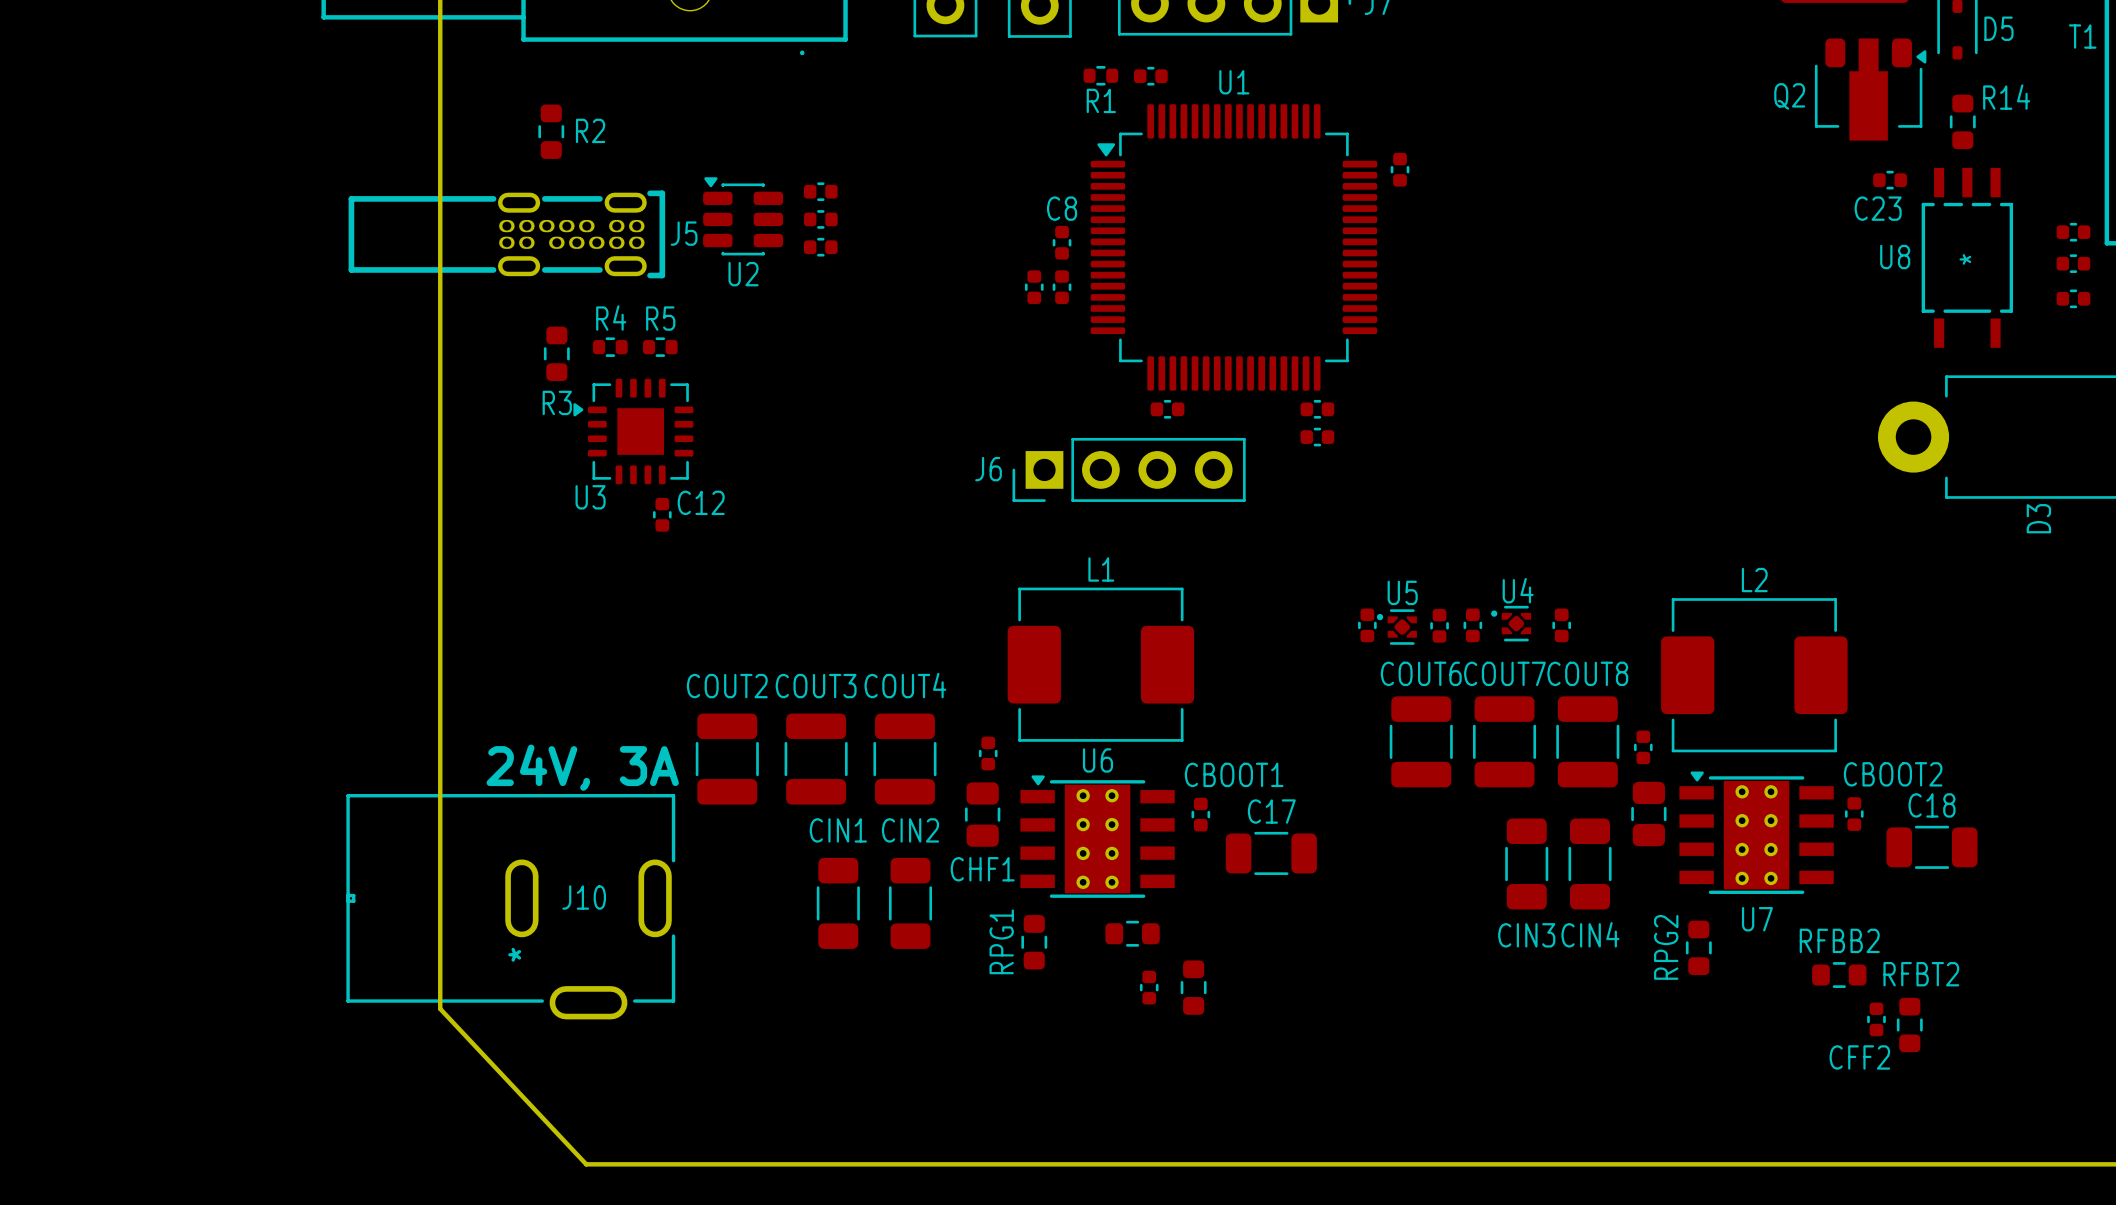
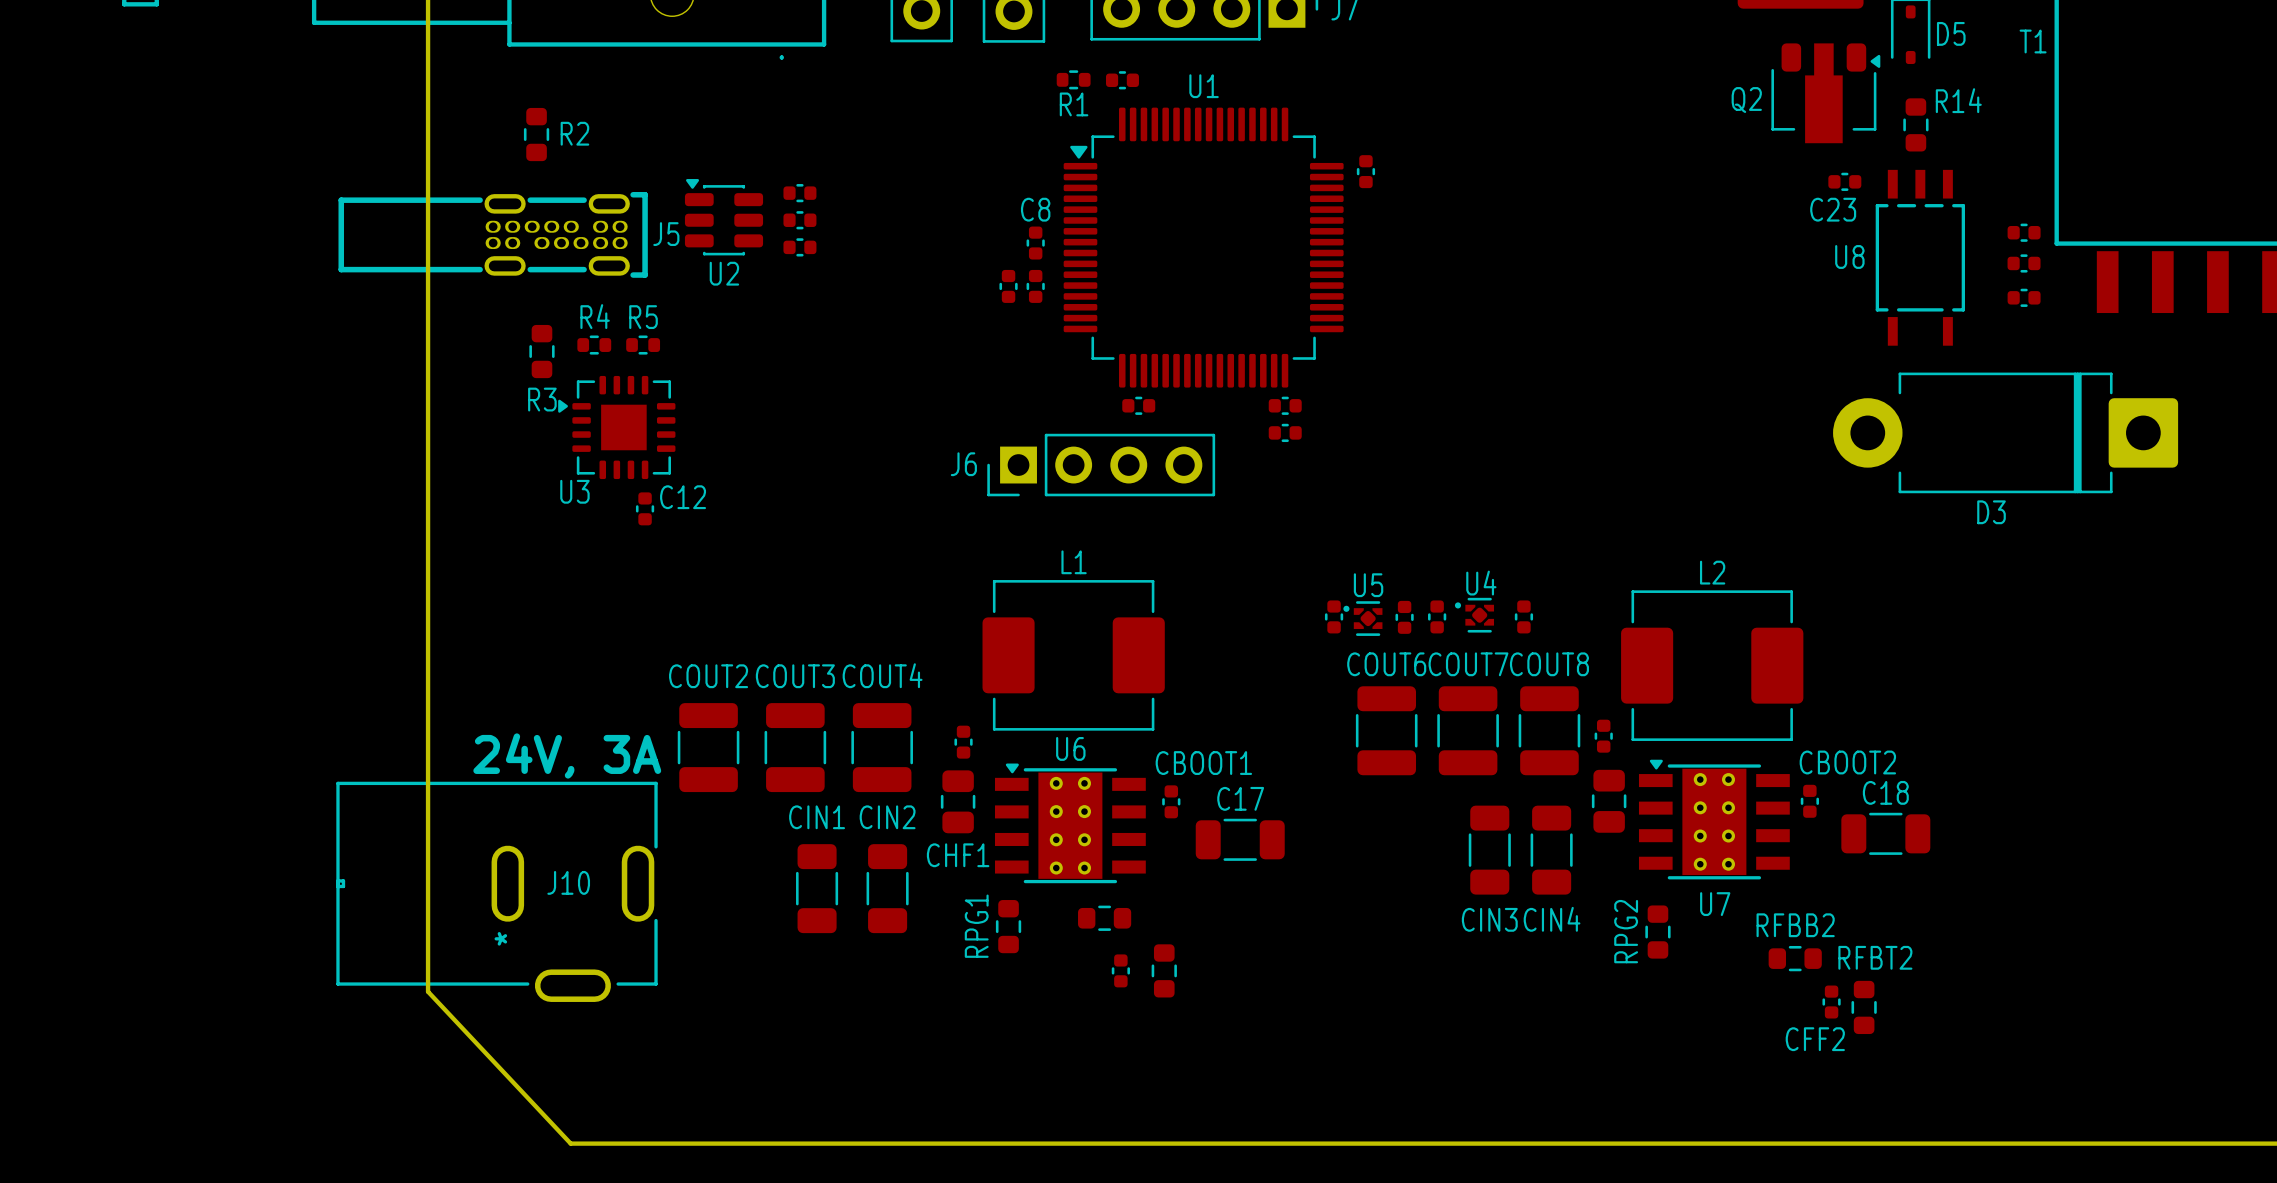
U8 text: * (1965, 259) -> none
D3 name rotation: 0° (2038, 518) -> 90° clockwise (1991, 512)

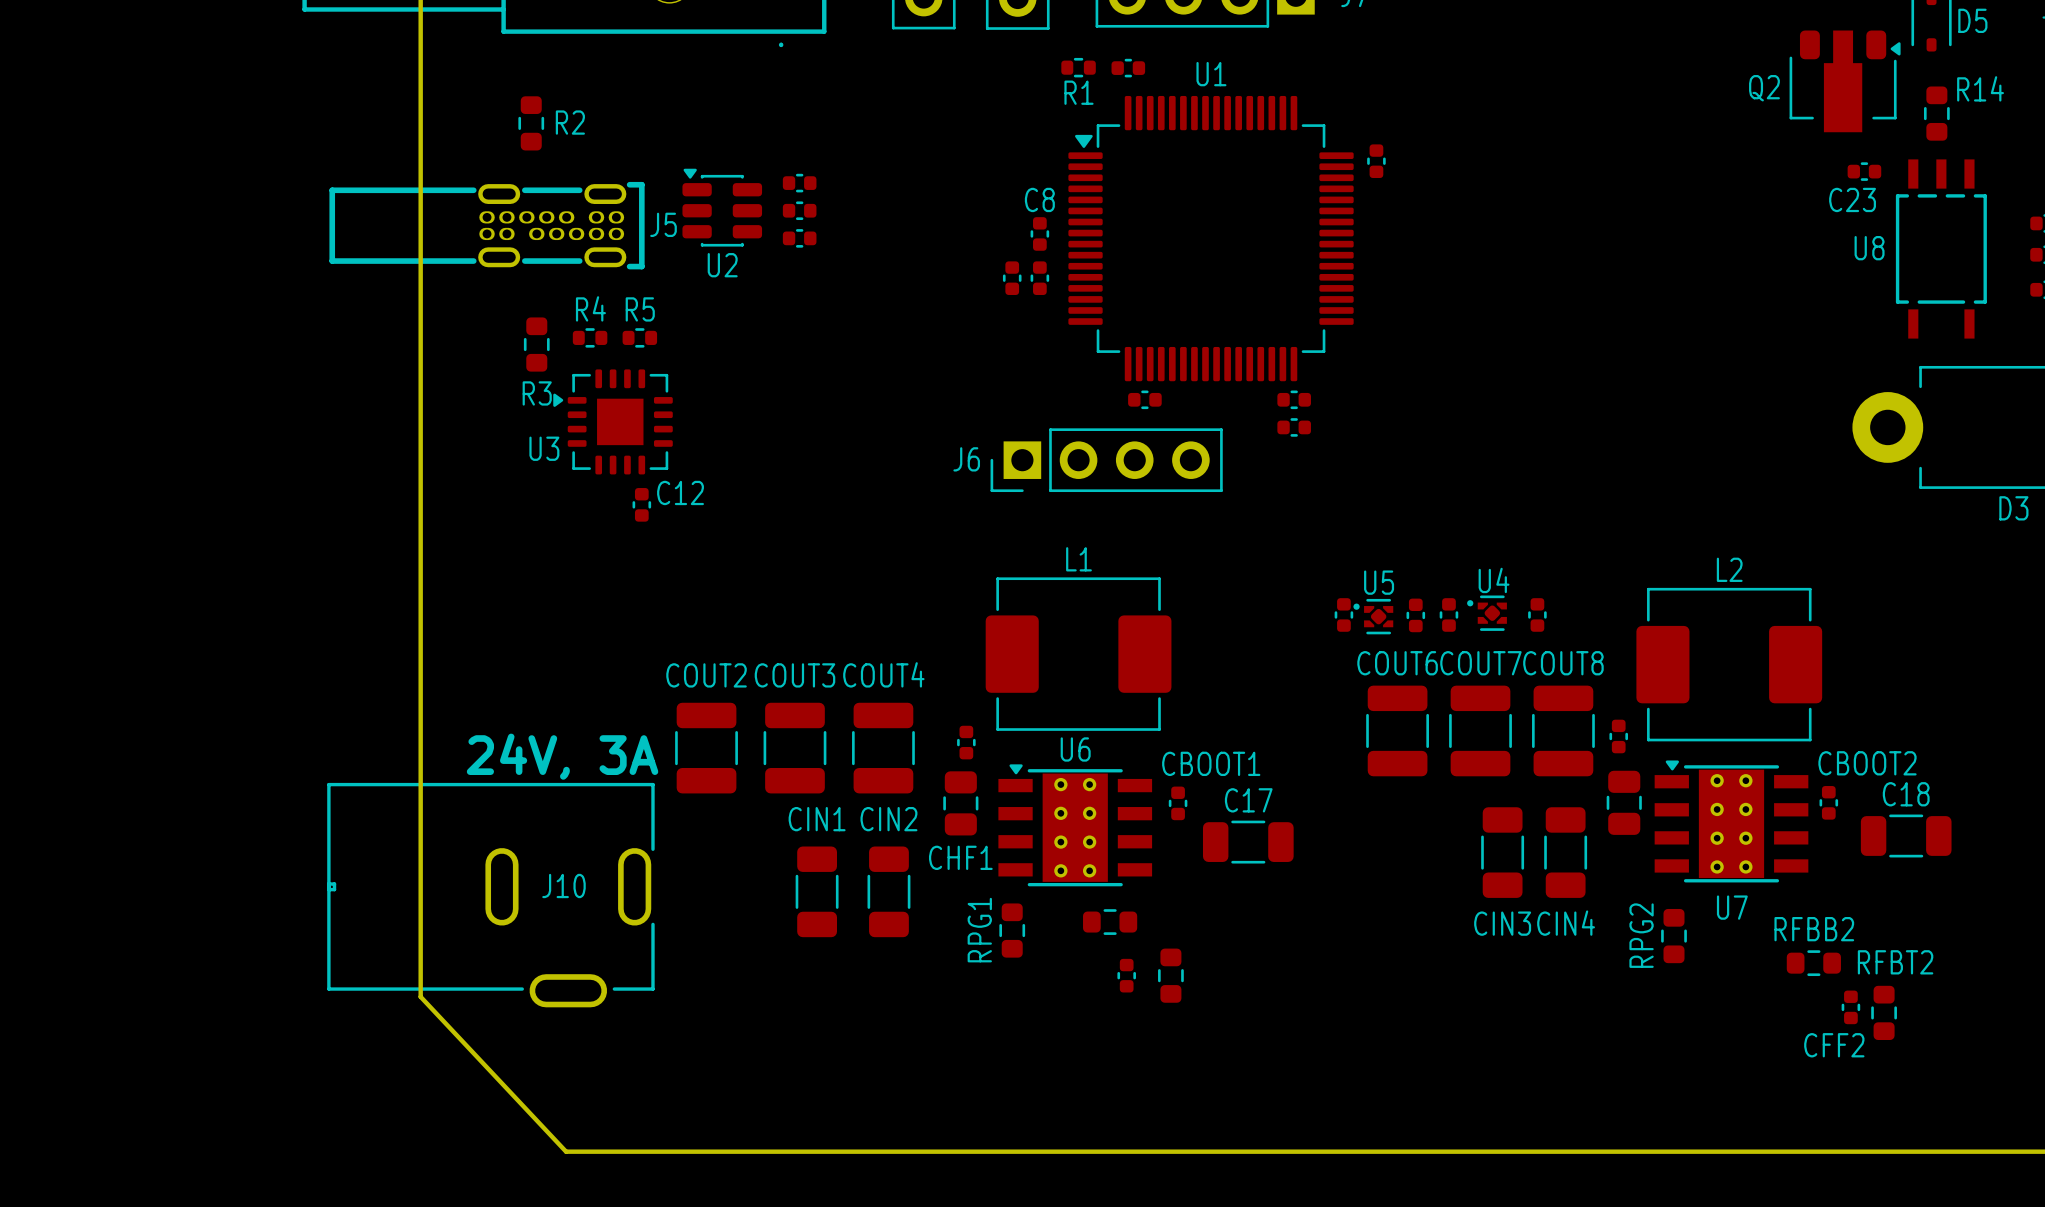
U3 name position: U3 (574, 491) -> U3 (544, 448)
J10 text: * (500, 938) -> none

